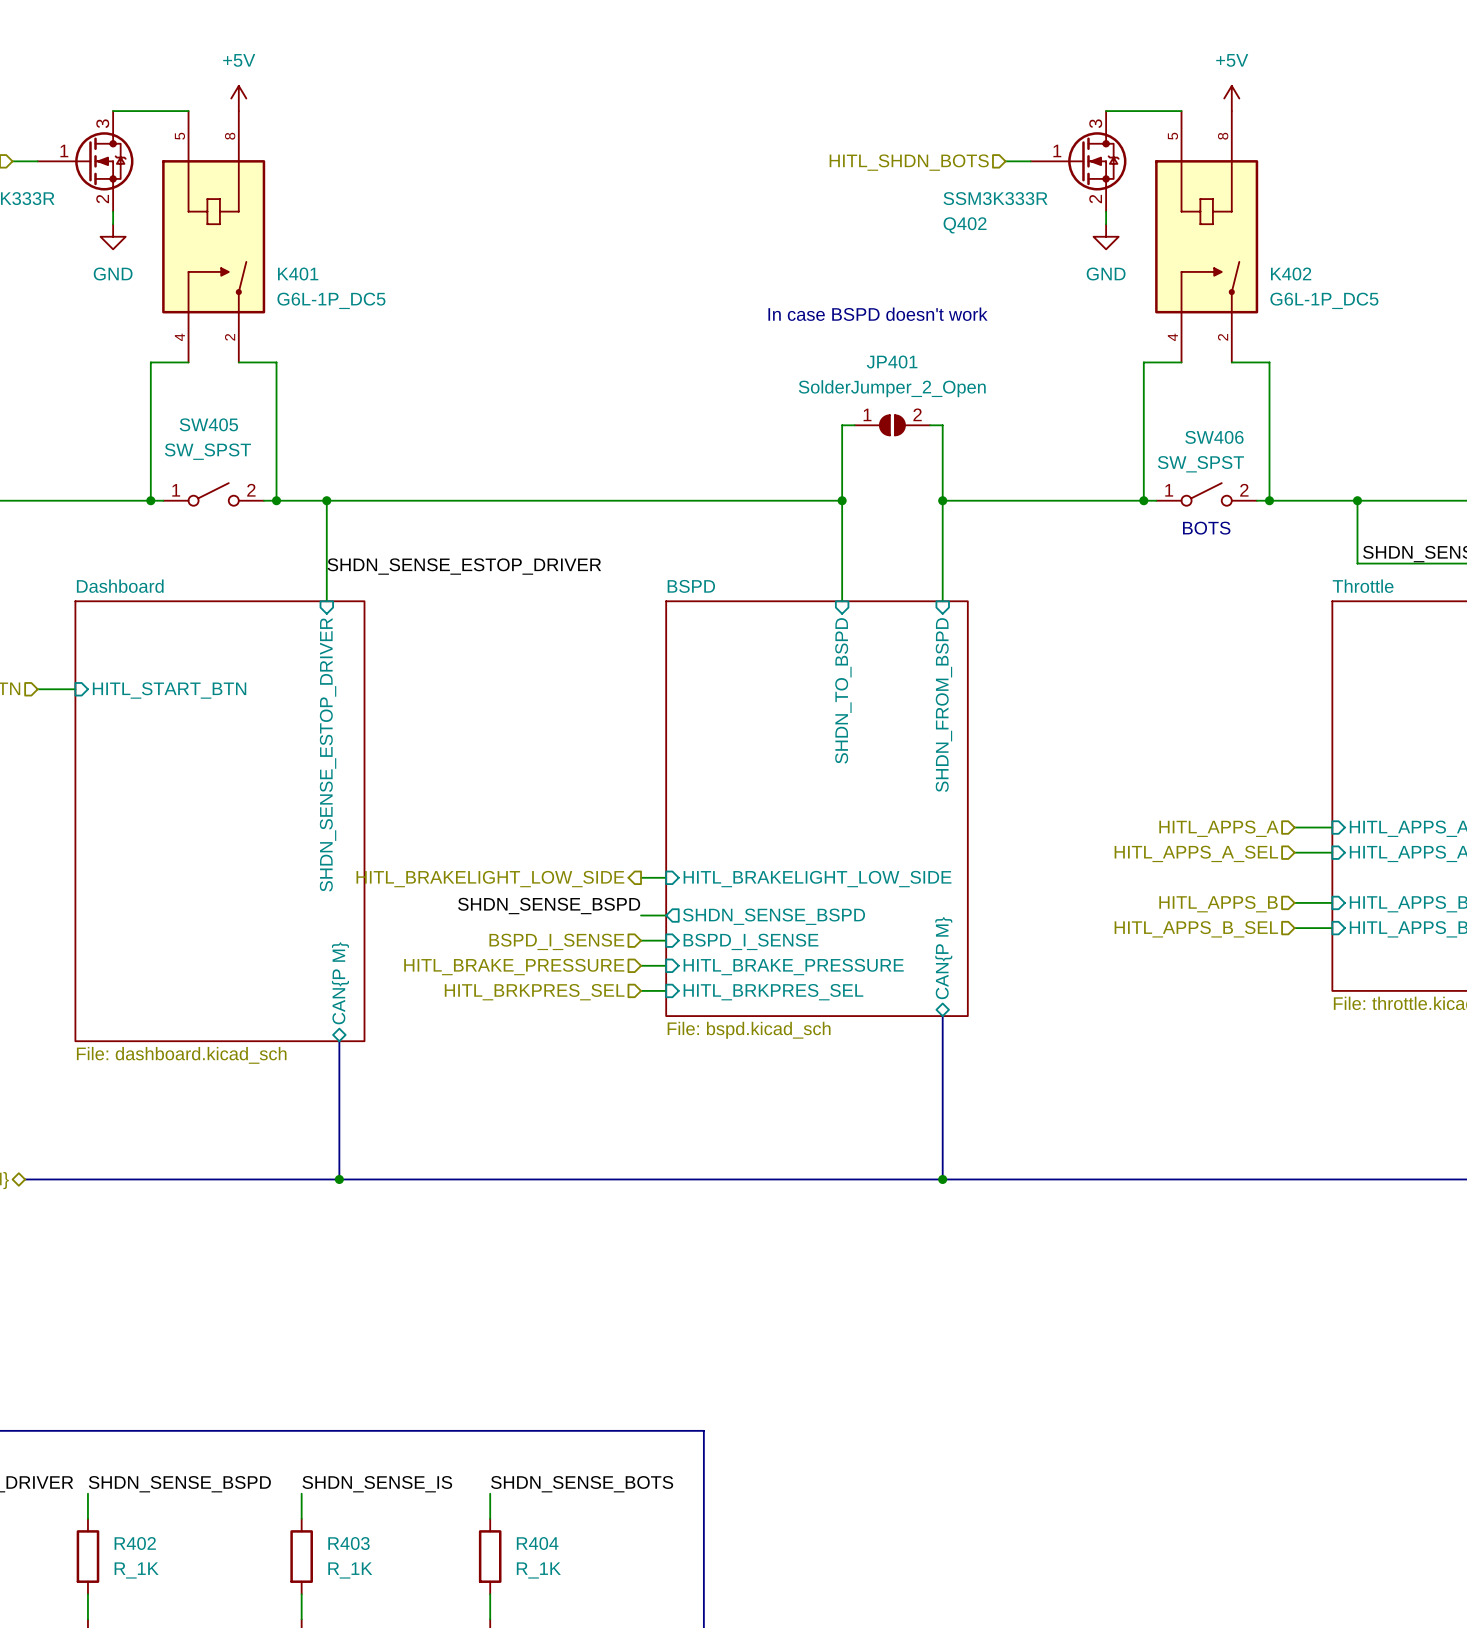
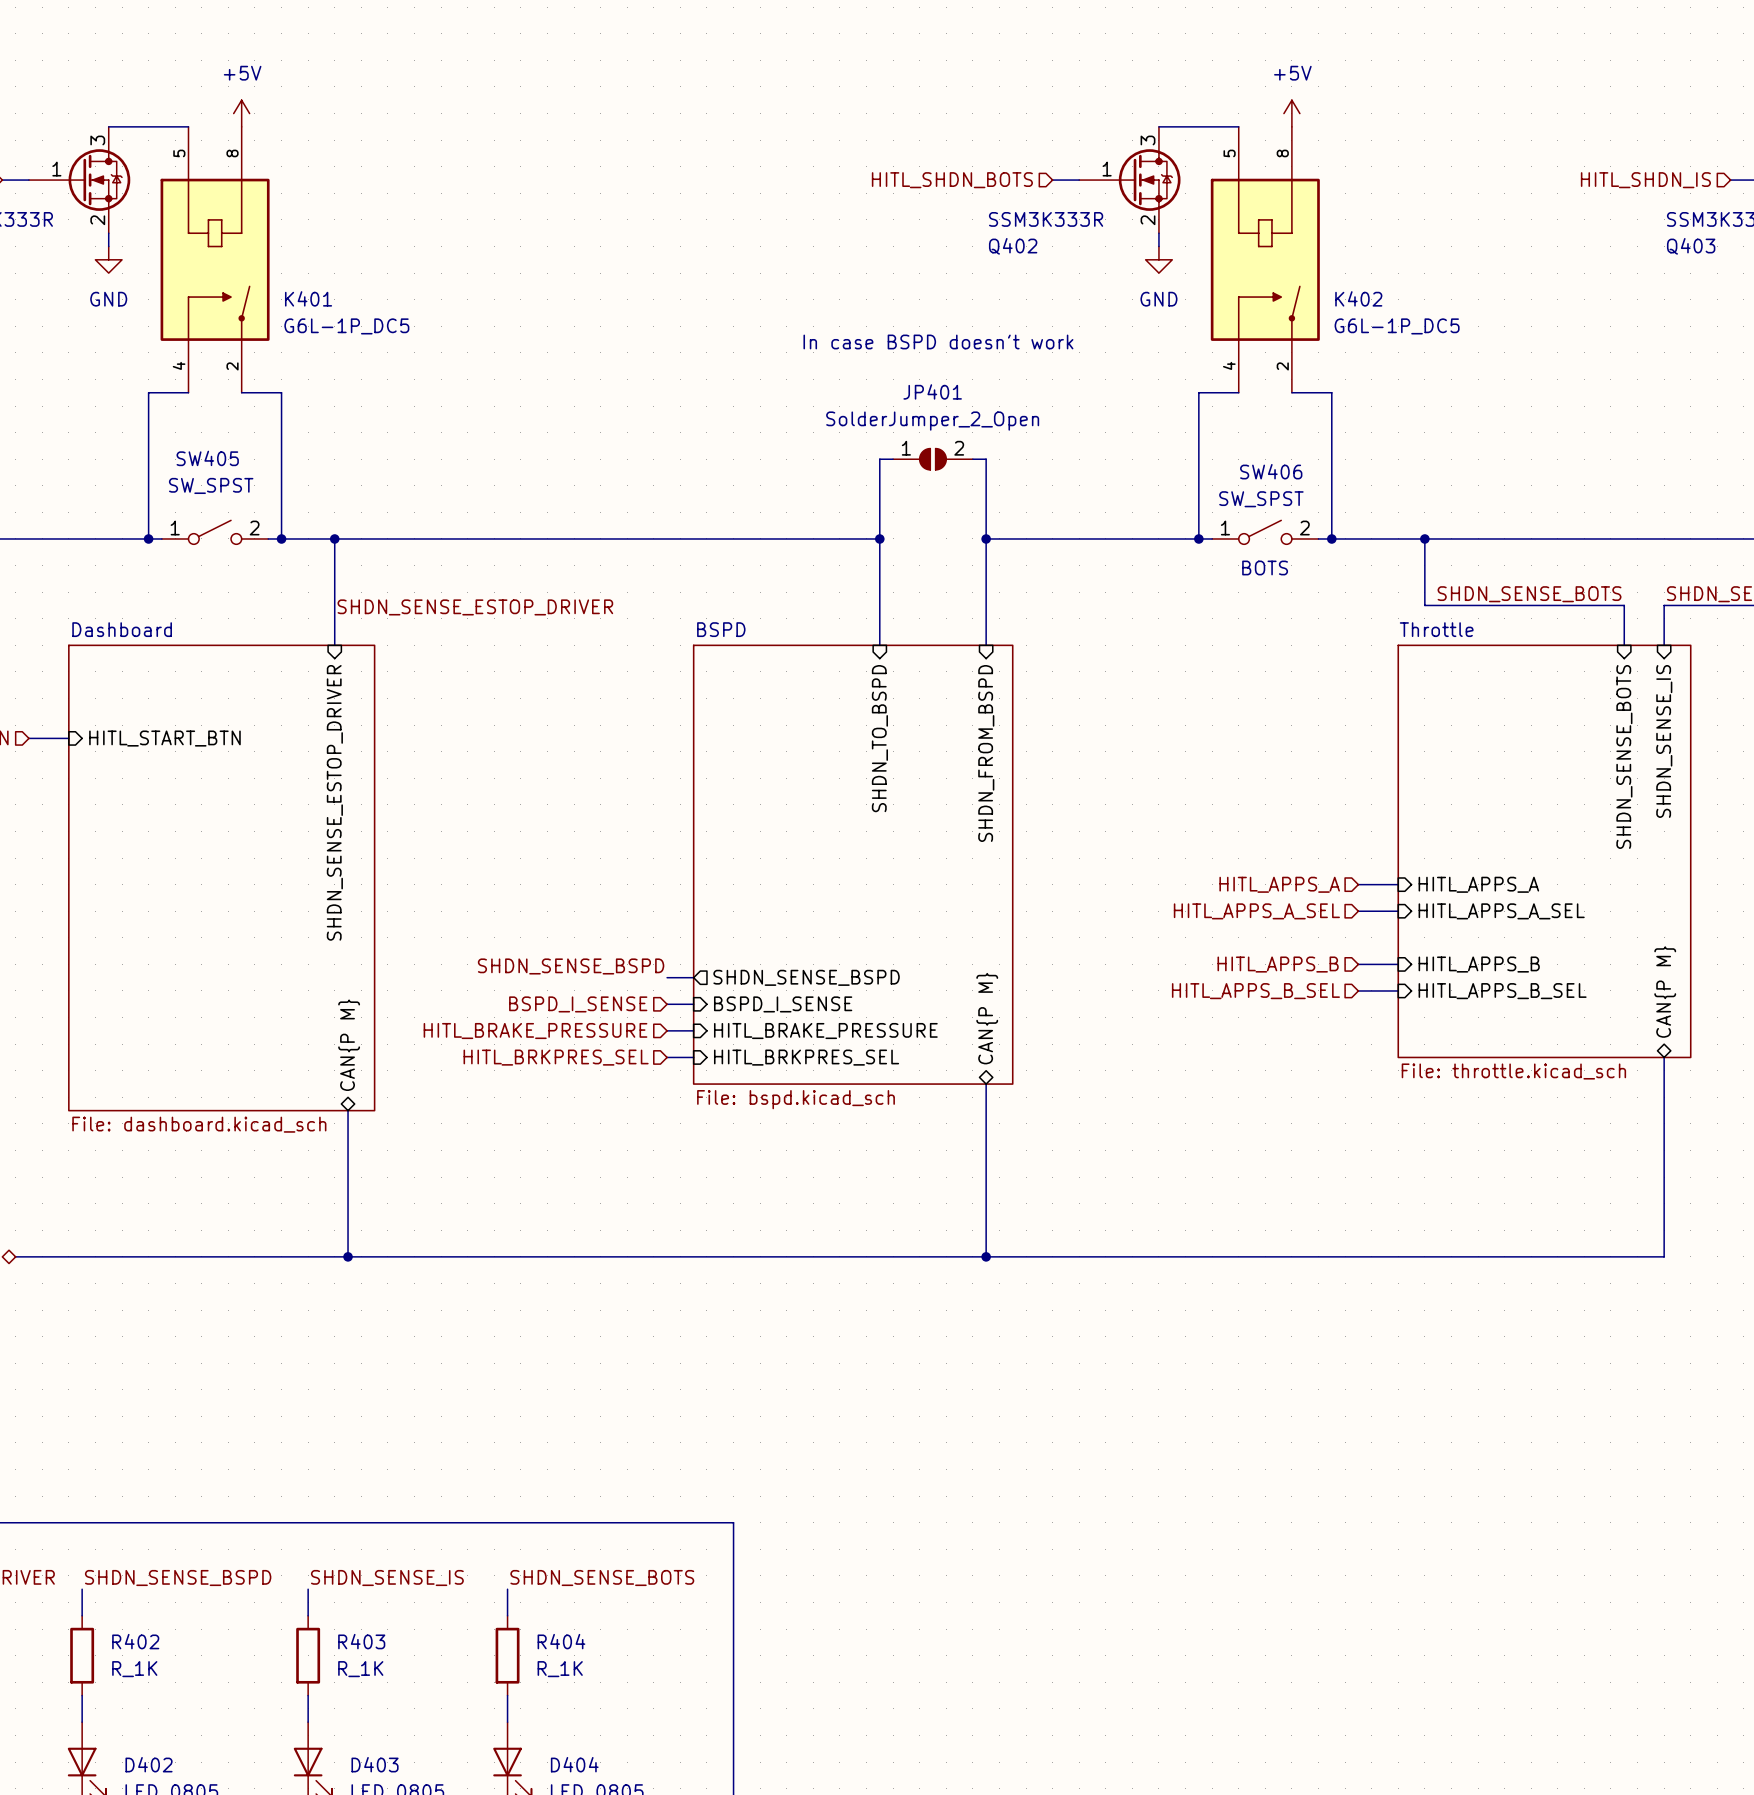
wire: (641, 877) (666, 877) -> none
hierarchical label: HITL_BRAKELIGHT_LOW_SIDE (490, 879) -> none
sheet pin: HITL_BRAKELIGHT_LOW_SIDE (817, 879) -> none

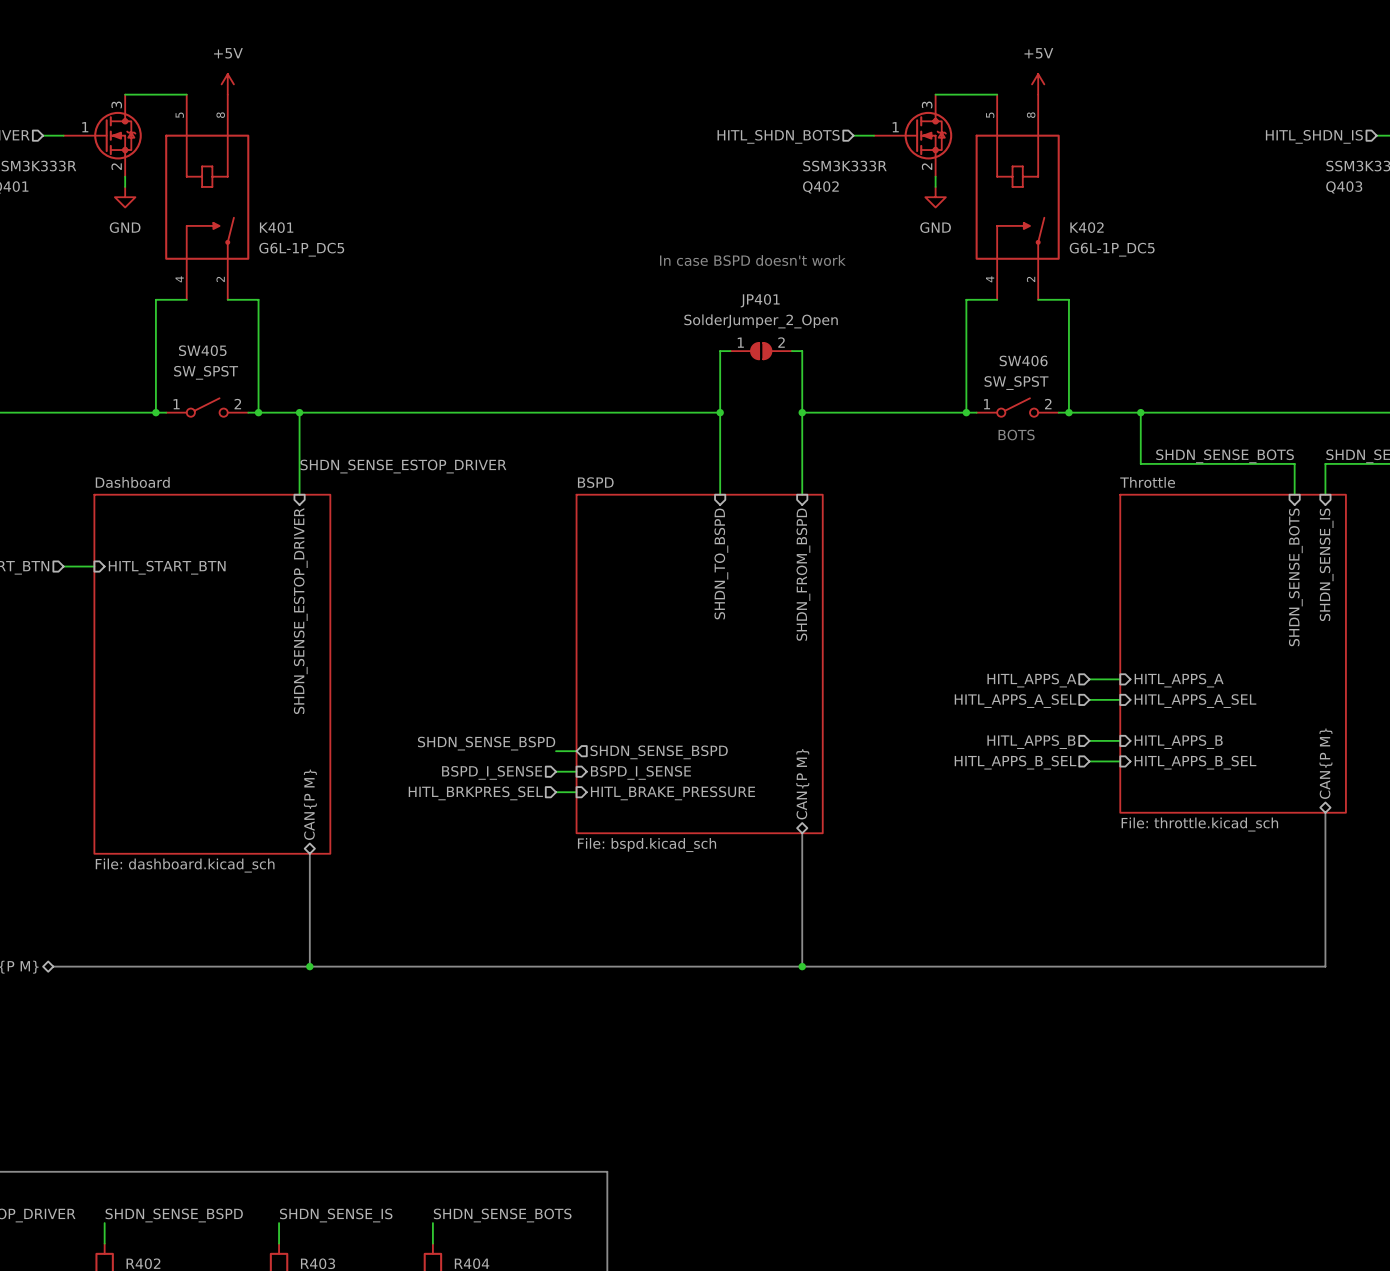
hierarchical label: HITL_BRAKE_PRESSURE (535, 1031) -> HITL_BRKPRES_SEL (475, 793)
hierarchical label: HITL_BRKPRES_SEL (556, 1057) -> none
wire: (667, 1057) (693, 1057) -> none
sheet pin: HITL_BRKPRES_SEL (806, 1057) -> none

